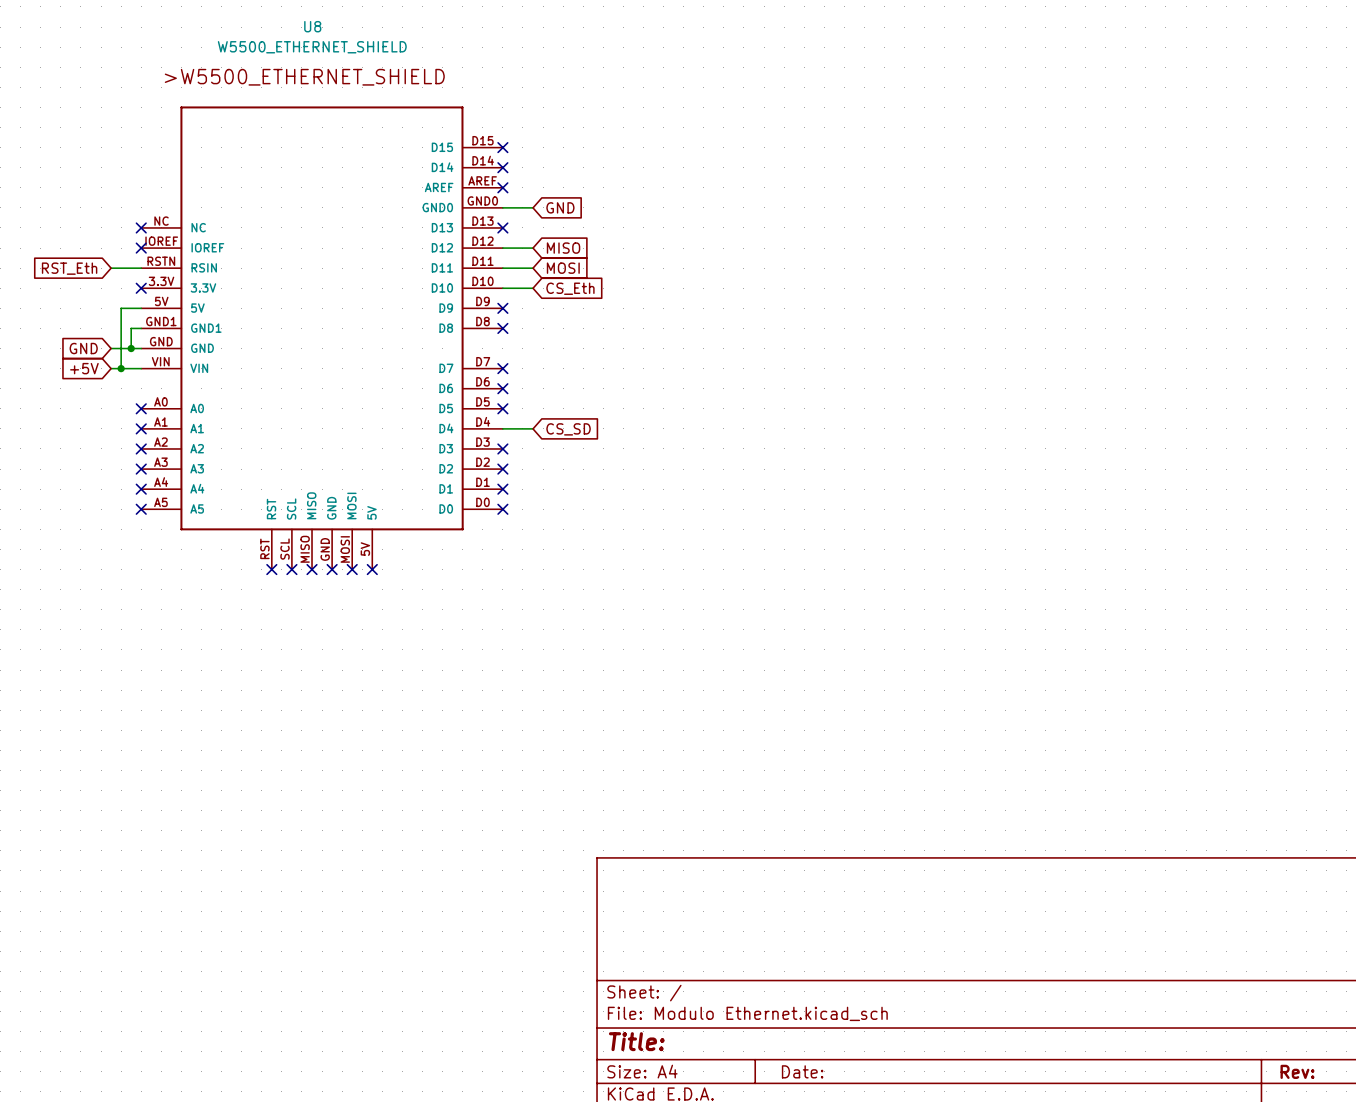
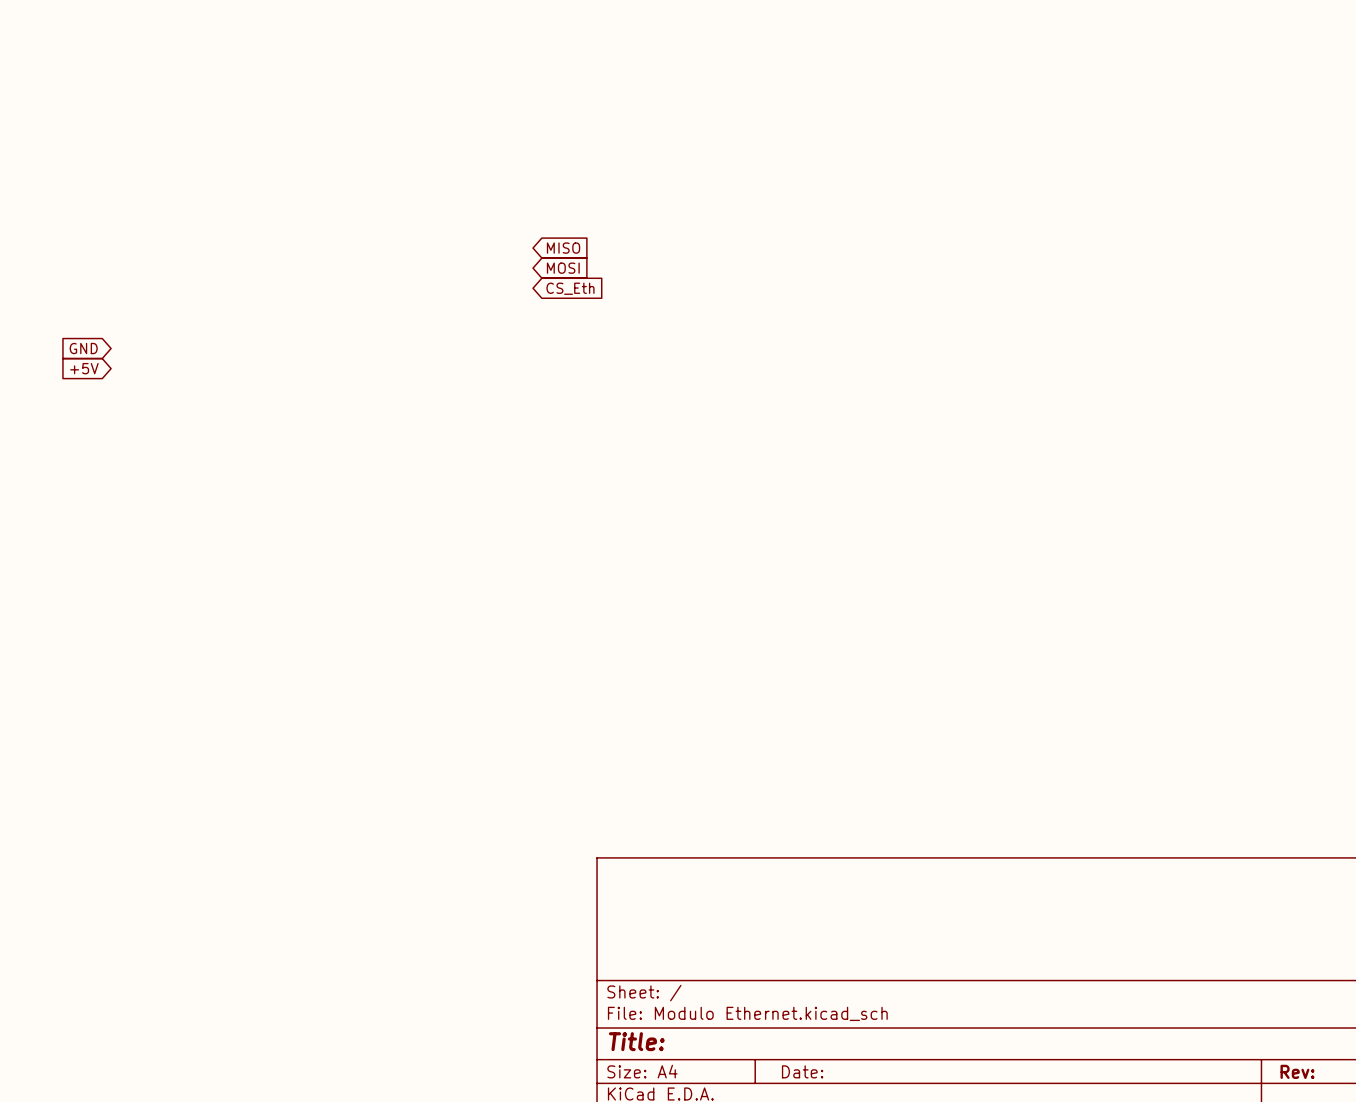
no-connect mark: (502, 147) -> none
no-connect mark: (502, 167) -> none
no-connect mark: (502, 187) -> none
wire: (502, 207) (533, 207) -> none
global label: GND (560, 207) -> none
no-connect mark: (141, 227) -> none
no-connect mark: (502, 227) -> none
no-connect mark: (141, 248) -> none
wire: (502, 248) (533, 248) -> none
global label: RST_Eth (69, 268) -> none
wire: (111, 268) (141, 268) -> none
wire: (502, 268) (533, 268) -> none
no-connect mark: (141, 288) -> none
wire: (502, 288) (533, 288) -> none
wire: (141, 308) (121, 308) (121, 368) -> none
no-connect mark: (502, 308) -> none
wire: (141, 328) (131, 328) (131, 348) -> none
no-connect mark: (502, 328) -> none
U8: W5500_ETHERNET_SHIELD (322, 337) -> none
wire: (111, 348) (141, 348) -> none
junction: (131, 348) -> none
wire: (111, 368) (141, 368) -> none
junction: (121, 368) -> none
no-connect mark: (502, 368) -> none
no-connect mark: (502, 388) -> none
no-connect mark: (141, 408) -> none
no-connect mark: (502, 408) -> none
no-connect mark: (141, 428) -> none
wire: (502, 428) (533, 428) -> none
global label: CS_SD (568, 429) -> none
no-connect mark: (141, 448) -> none
no-connect mark: (502, 448) -> none
no-connect mark: (141, 469) -> none
no-connect mark: (502, 469) -> none
no-connect mark: (141, 489) -> none
no-connect mark: (502, 489) -> none
no-connect mark: (141, 509) -> none
no-connect mark: (502, 509) -> none
no-connect mark: (271, 569) -> none
no-connect mark: (291, 569) -> none
no-connect mark: (312, 569) -> none
no-connect mark: (332, 569) -> none
no-connect mark: (352, 569) -> none
no-connect mark: (372, 569) -> none

